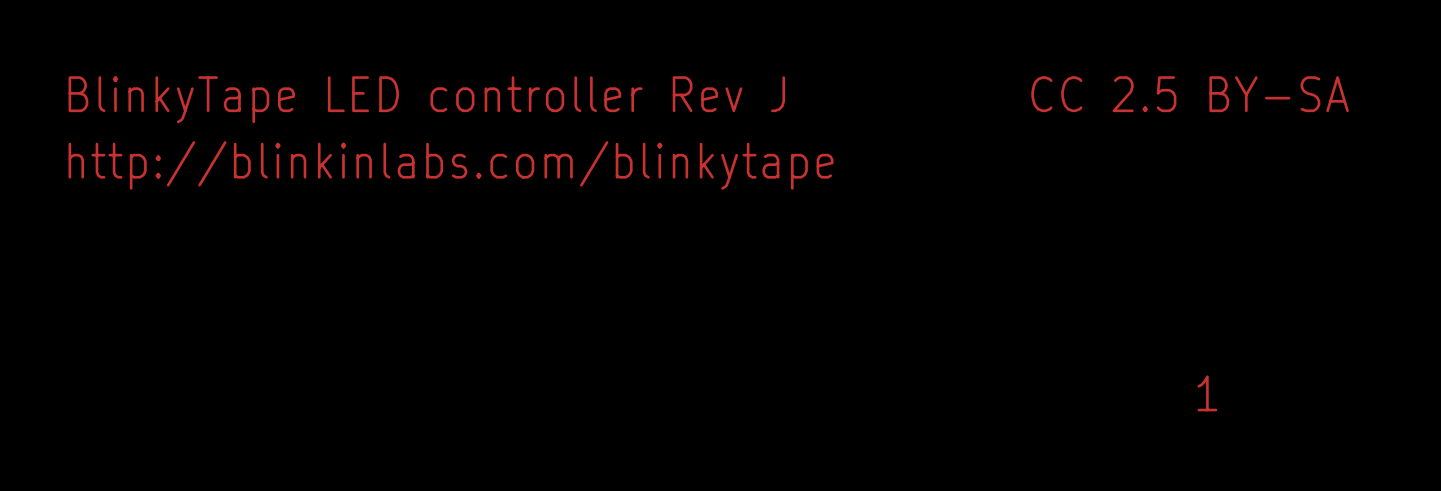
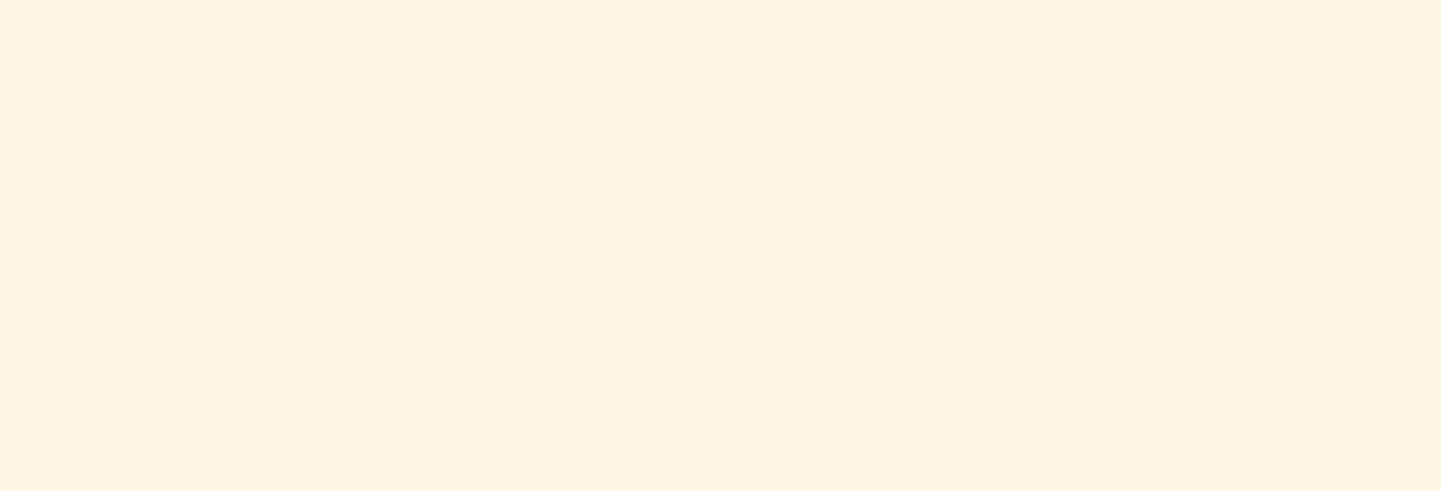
text: CC 2.5 BY-SA (1190, 94) -> none
text: BlinkyTape LED controller Rev J (426, 99) -> none
text: http://blinkinlabs.com/blinkytape (451, 165) -> none
text: 1 (1207, 393) -> none

